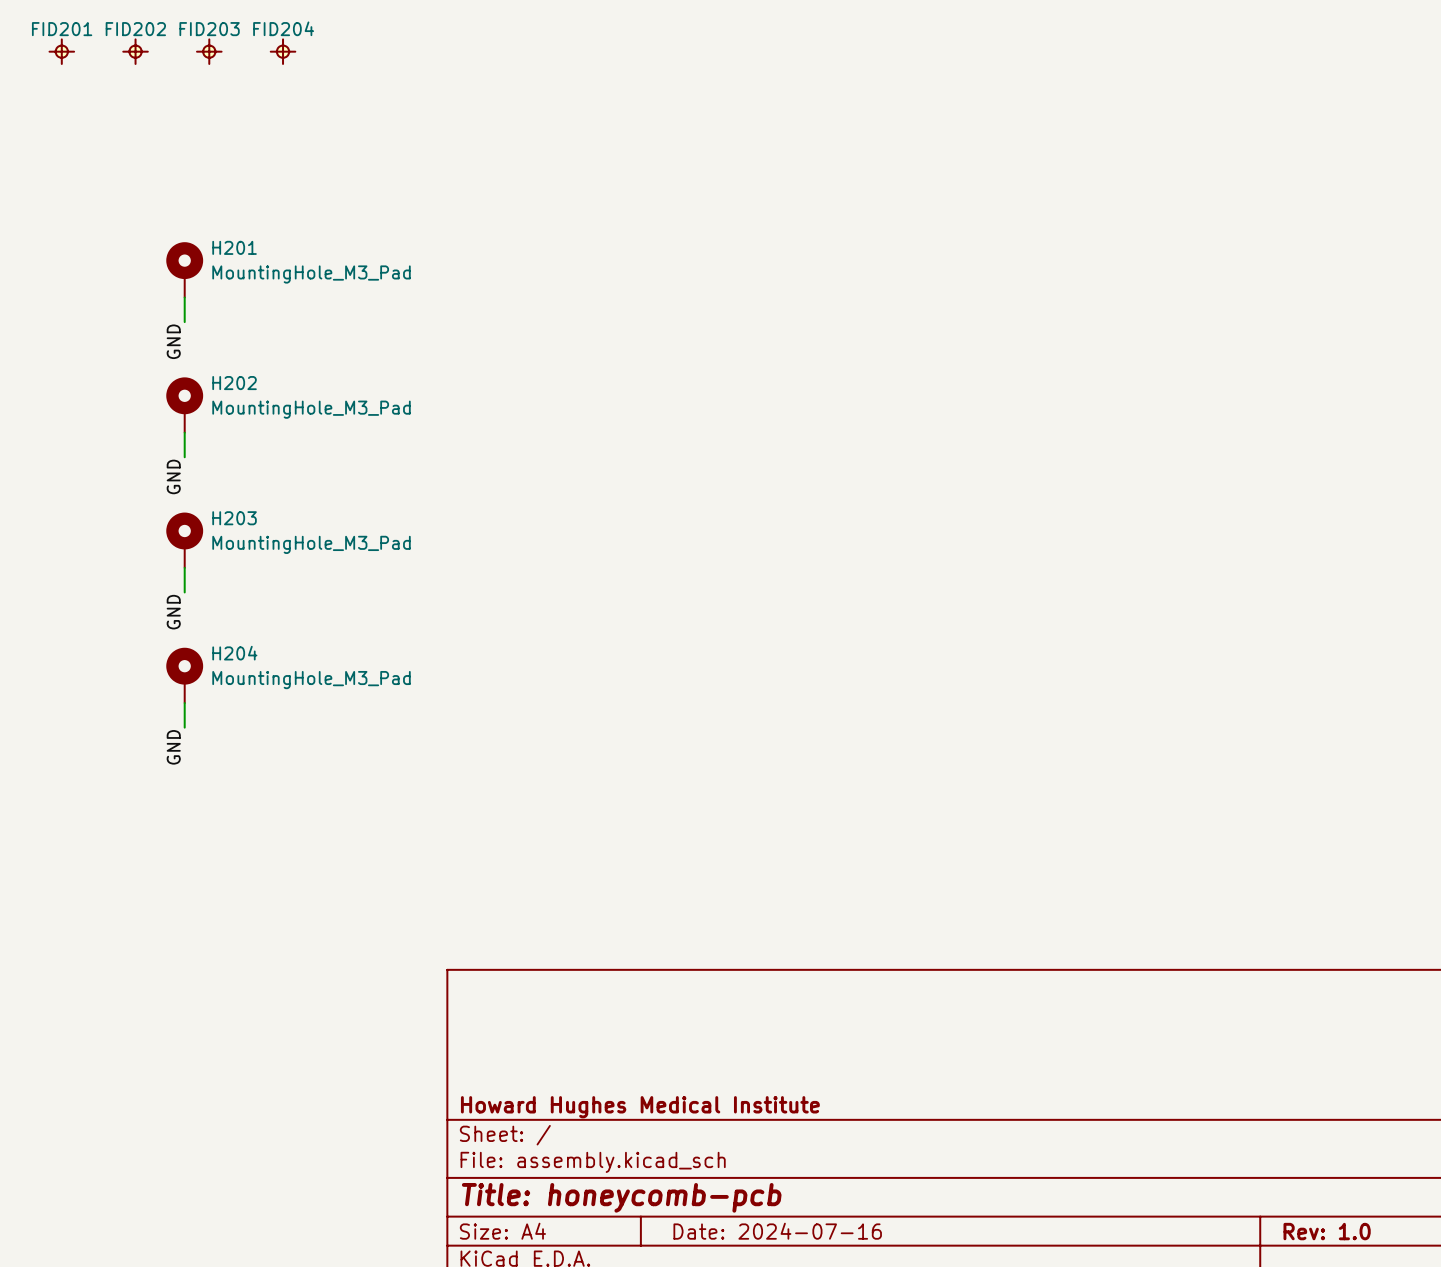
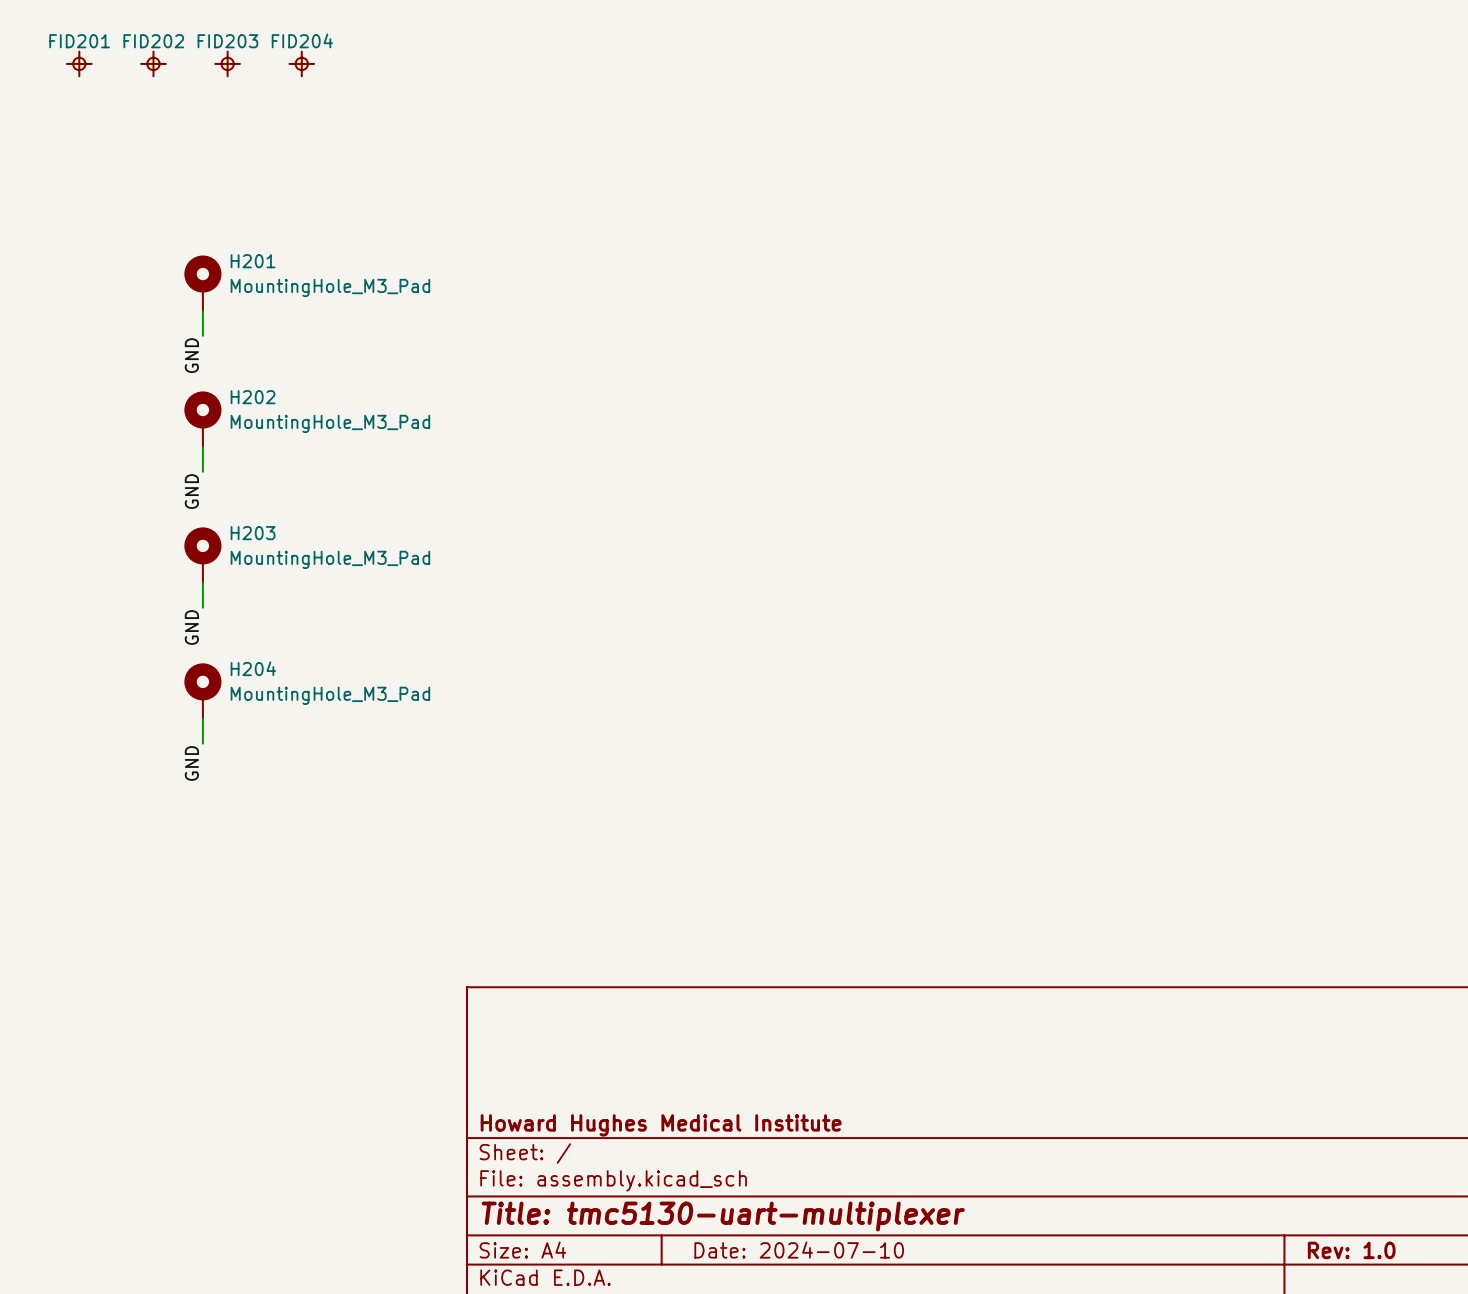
title block: Title: honeycomb-pcb (621, 1197) -> Title: tmc5130-uart-multiplexer (723, 1216)
title block: Date: 2024-07-16 (777, 1231) -> Date: 2024-07-10 (799, 1250)

